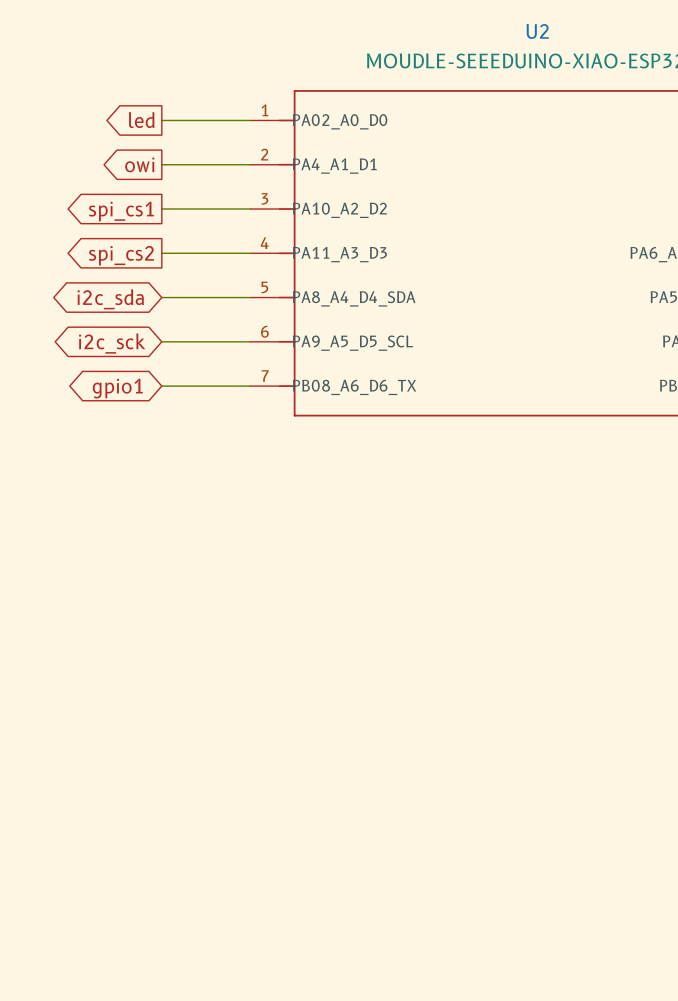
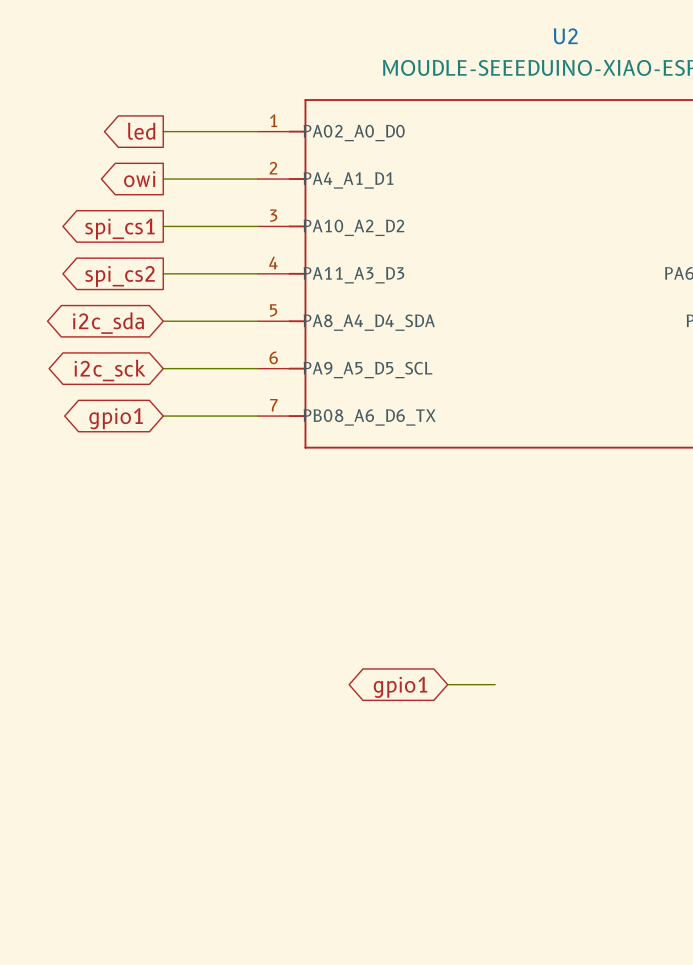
wire: none -> (447, 684) (495, 684)
global label: none -> gpio1 (400, 687)

